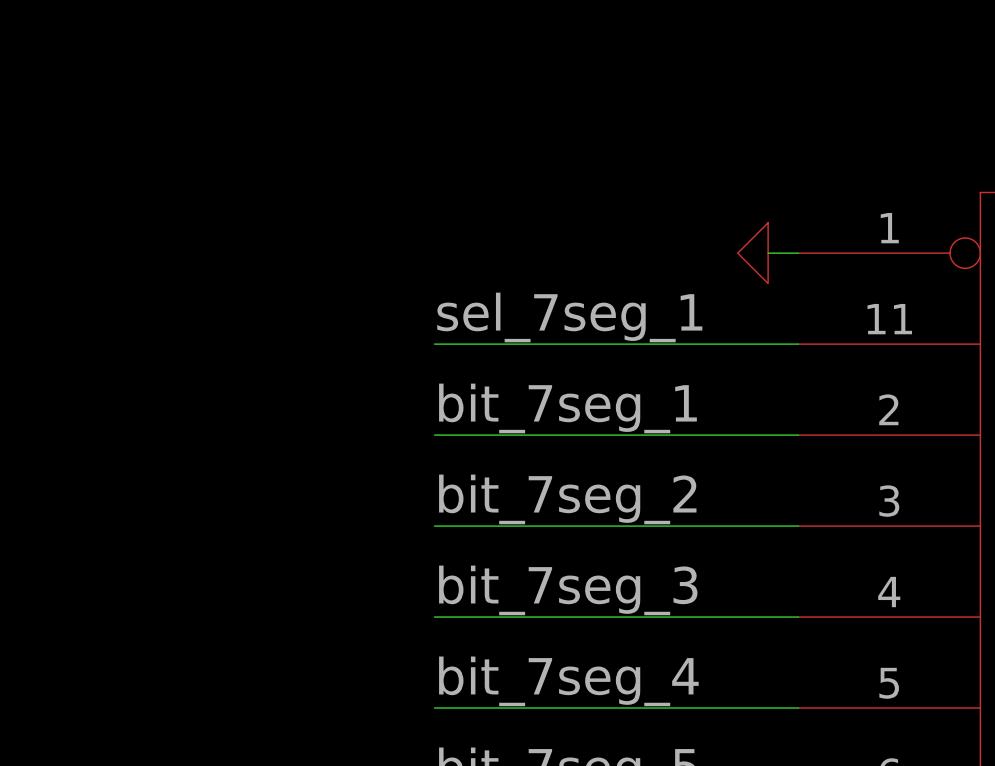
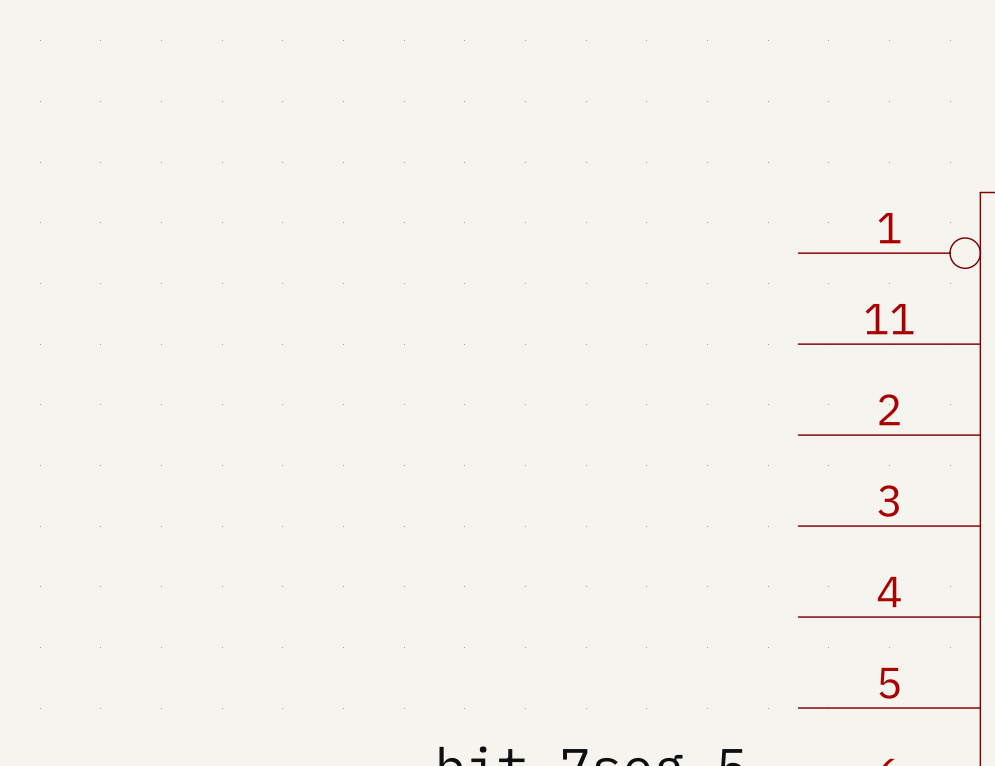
power symbol: (752, 253) -> none
wire: (768, 253) (798, 253) -> none
label: sel_7seg_1 (569, 317) -> none
wire: (434, 344) (798, 344) -> none
label: bit_7seg_1 (567, 408) -> none
wire: (434, 435) (798, 435) -> none
label: bit_7seg_2 (567, 499) -> none
wire: (434, 526) (798, 526) -> none
label: bit_7seg_3 (568, 590) -> none
wire: (434, 617) (798, 617) -> none
label: bit_7seg_4 (568, 681) -> none
wire: (434, 708) (798, 708) -> none

